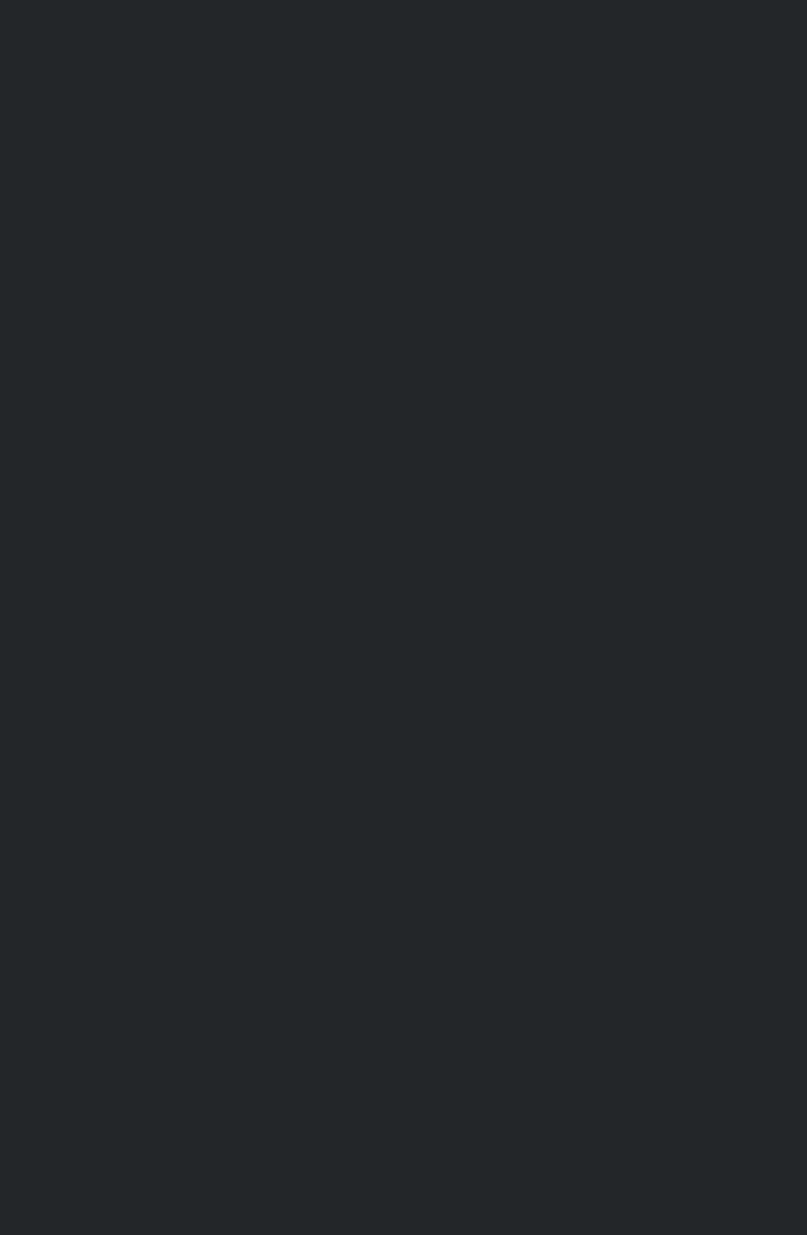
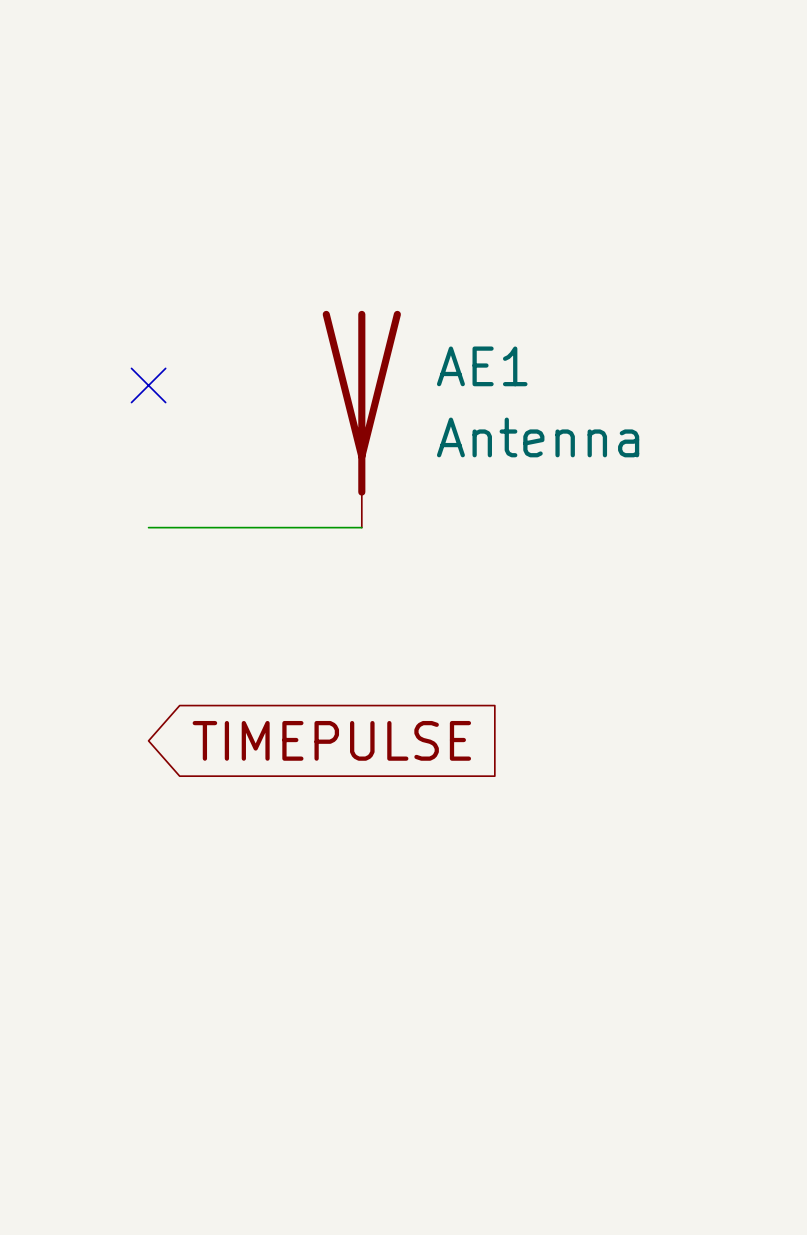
no-connect mark: none -> (148, 385)
AE1: none -> Antenna (361, 419)
wire: none -> (148, 527) (361, 527)
global label: none -> TIMEPULSE (331, 740)

